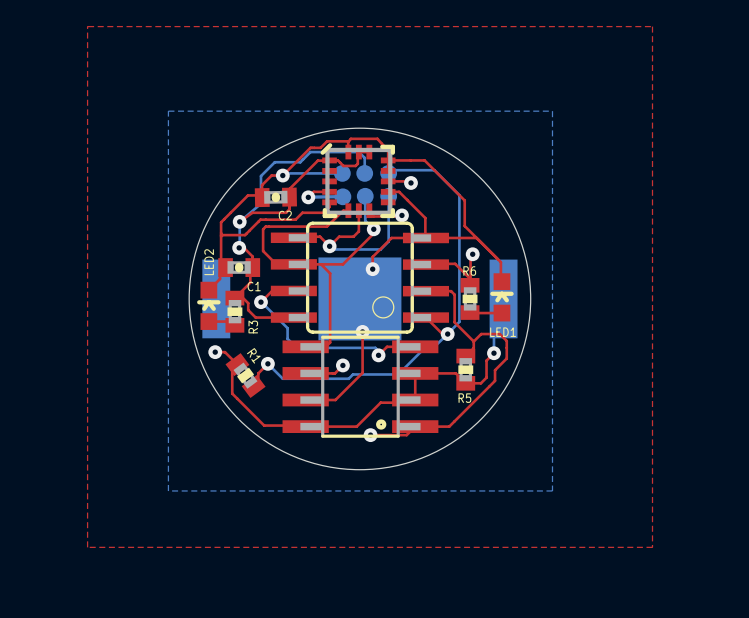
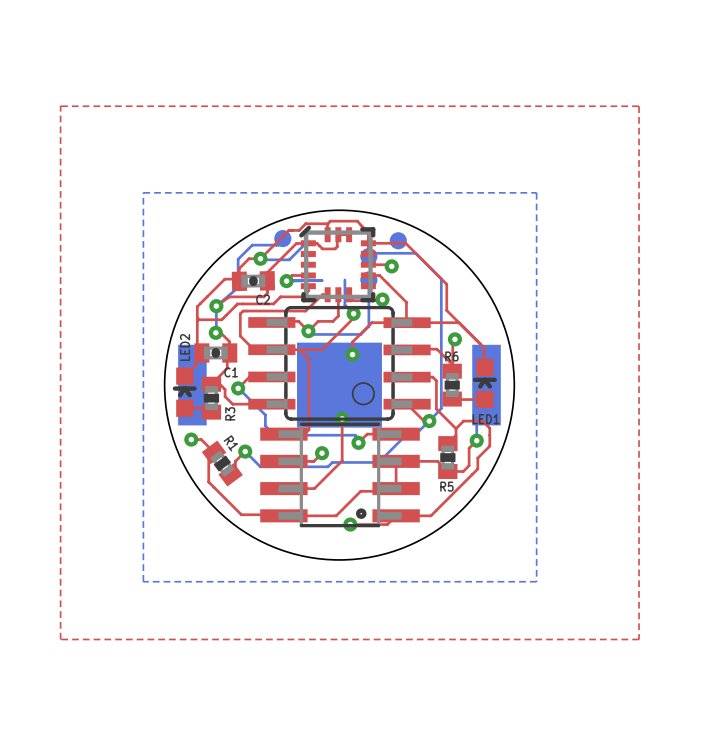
bottom track: none -> (305, 231) (305, 244) (289, 259) (260, 258)
bottom track: (310, 152) (358, 152) (364, 157) (364, 175) -> none
part: none -> (282, 238)
part: none -> (398, 240)
bottom track: (284, 173) (342, 173) -> none
part: (342, 173) -> none
part: (364, 173) -> none
part: (342, 196) -> none
part: (365, 196) -> none

